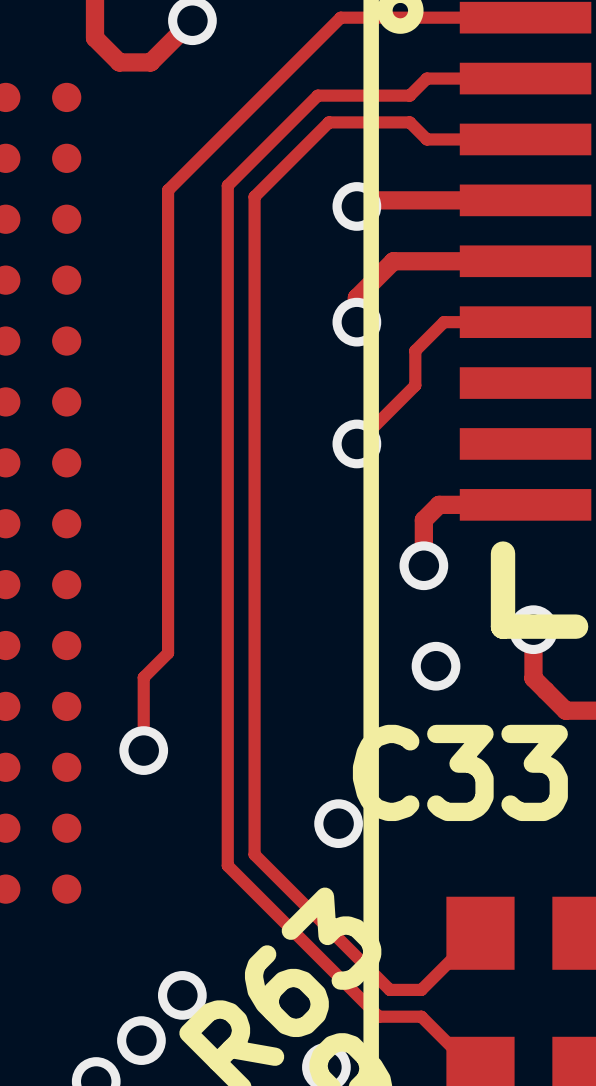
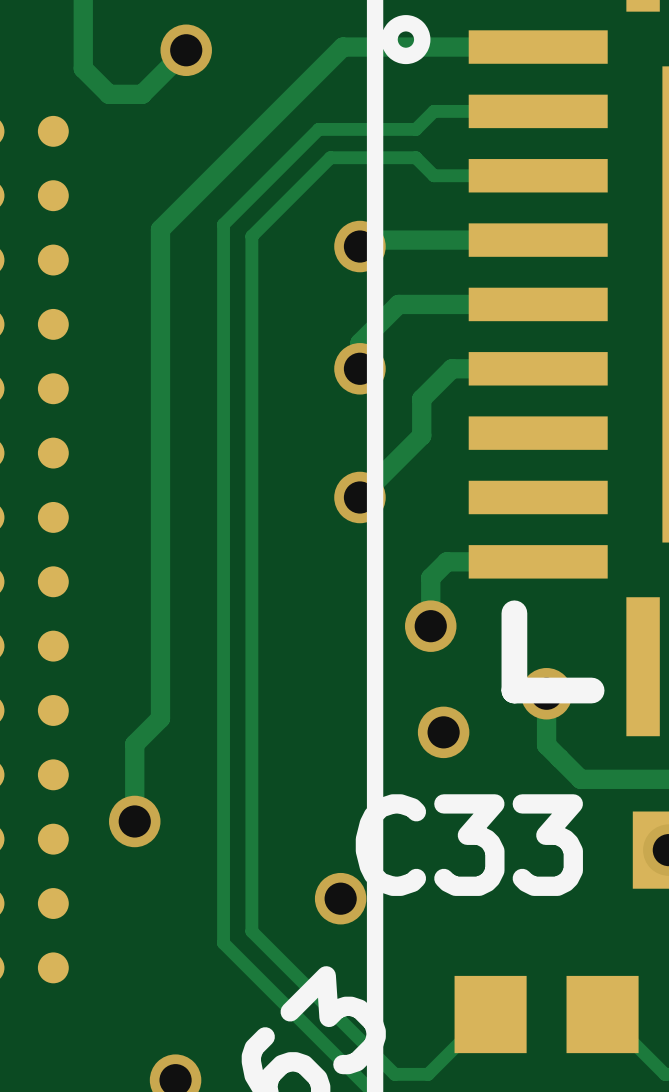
track width: thin (525, 17) (340, 17) (168, 190) (168, 653) (143, 677) (143, 750) -> thick (538, 47) (342, 47) (160, 229) (160, 718) (134, 744) (134, 821)
track width: thin (525, 322) (443, 322) (415, 350) (415, 385) (356, 443) -> thick (538, 368) (451, 368) (421, 399) (421, 435) (359, 497)

